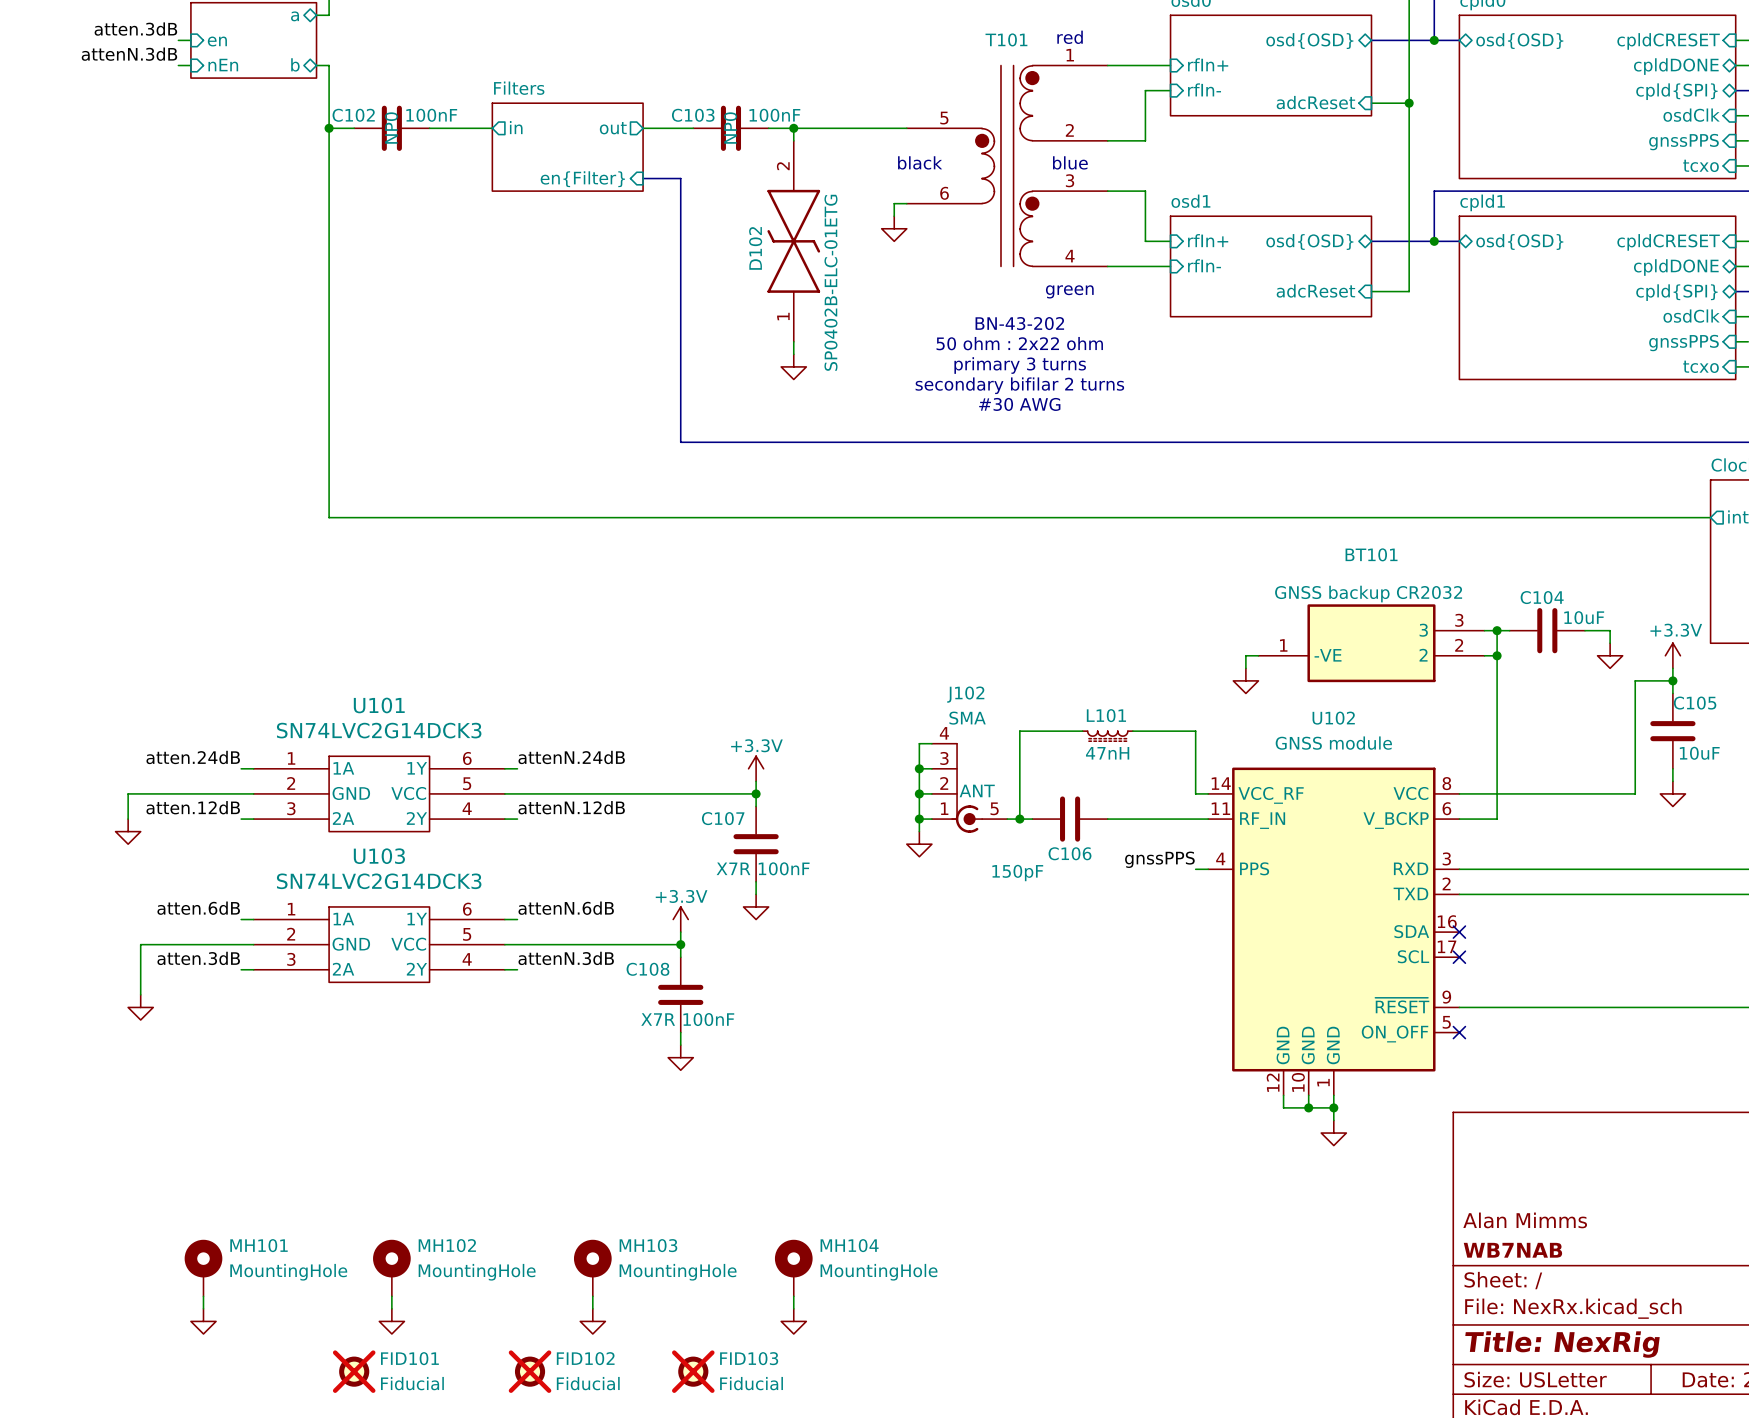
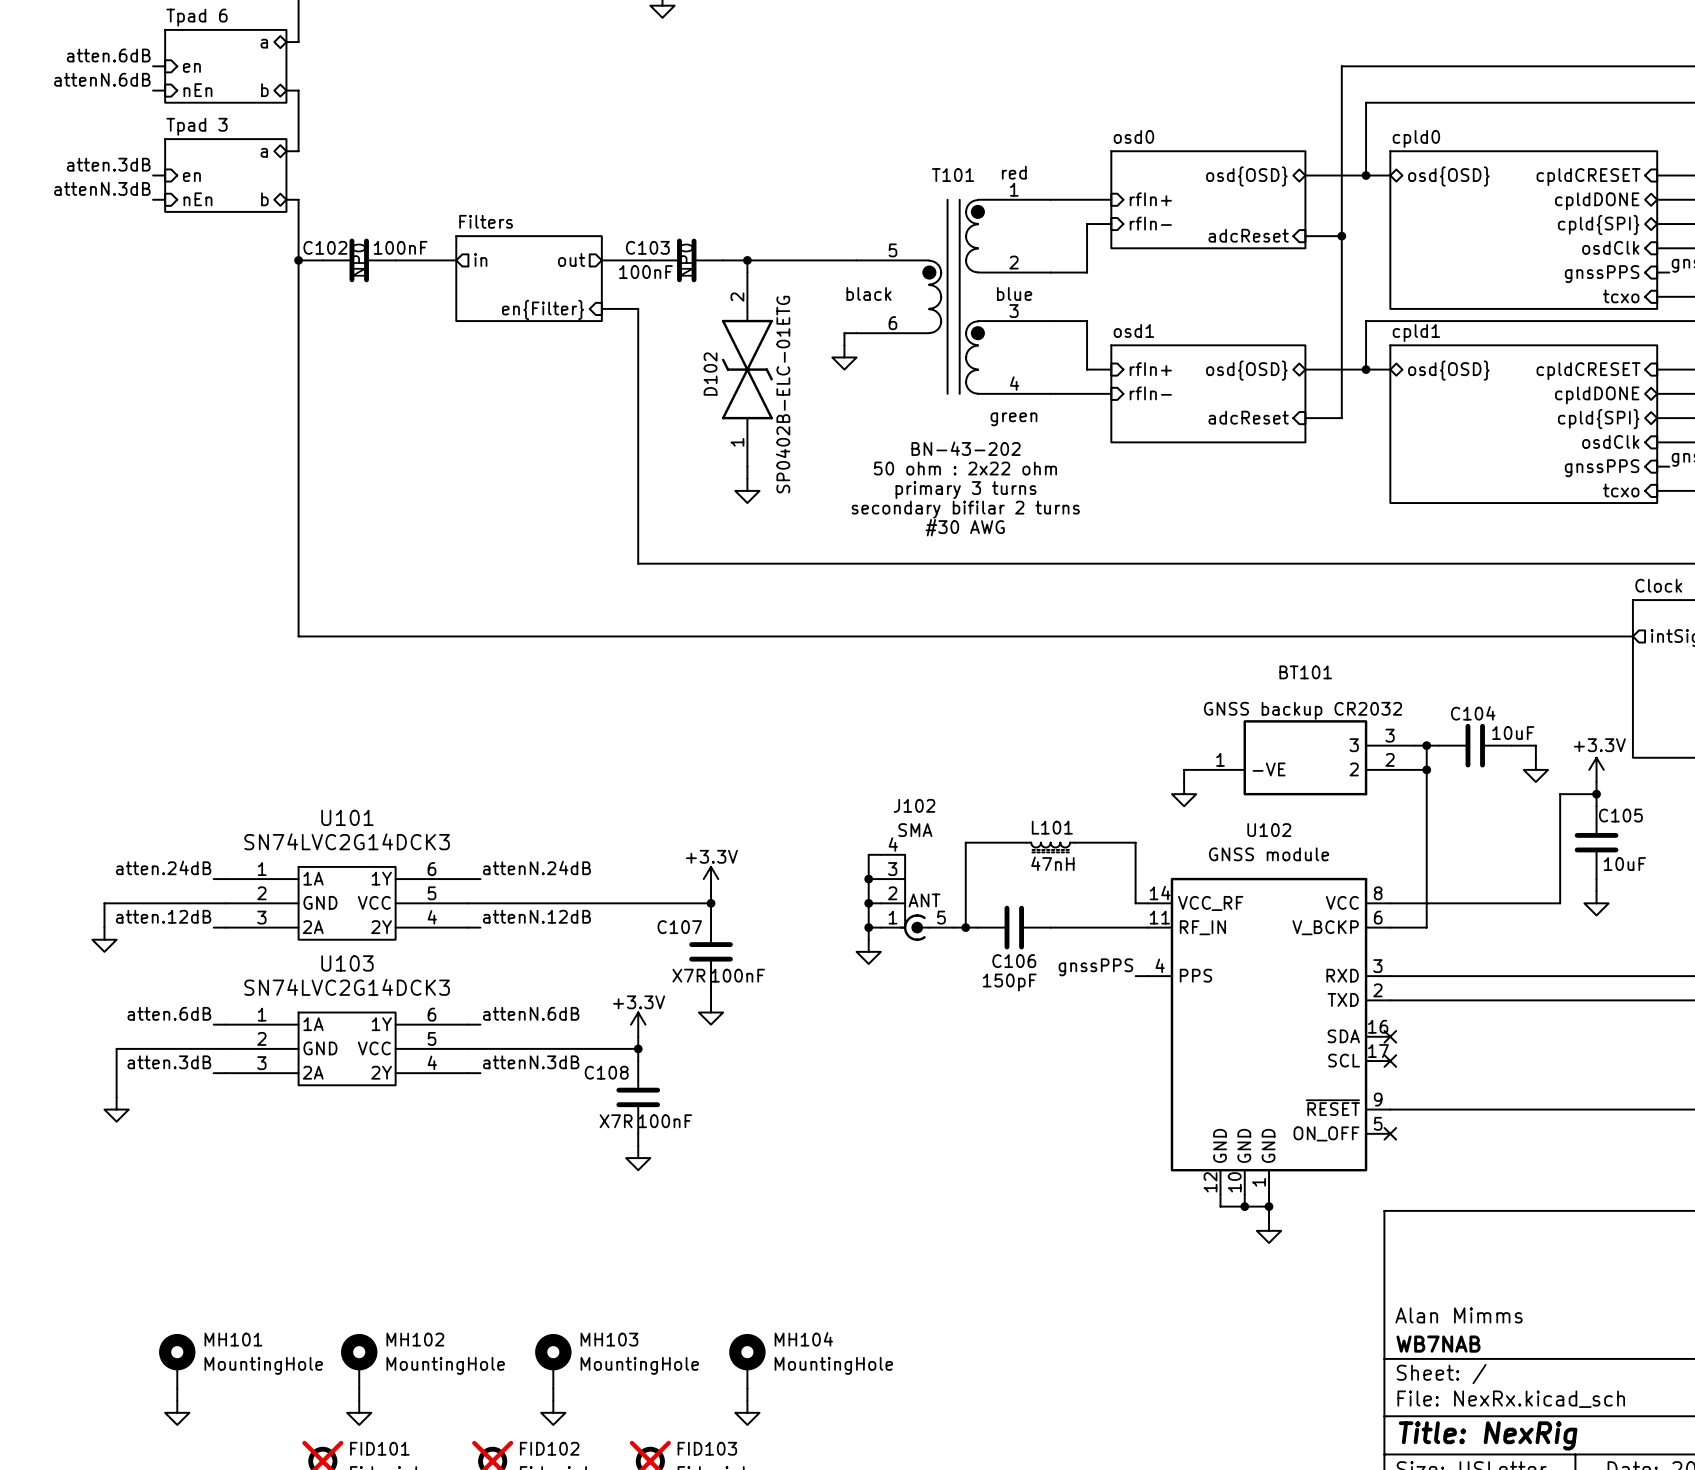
C103 value position: 100nF (774, 115) -> 100nF (645, 272)
C106 value position: 150pF (1017, 873) -> 150pF (1009, 982)

